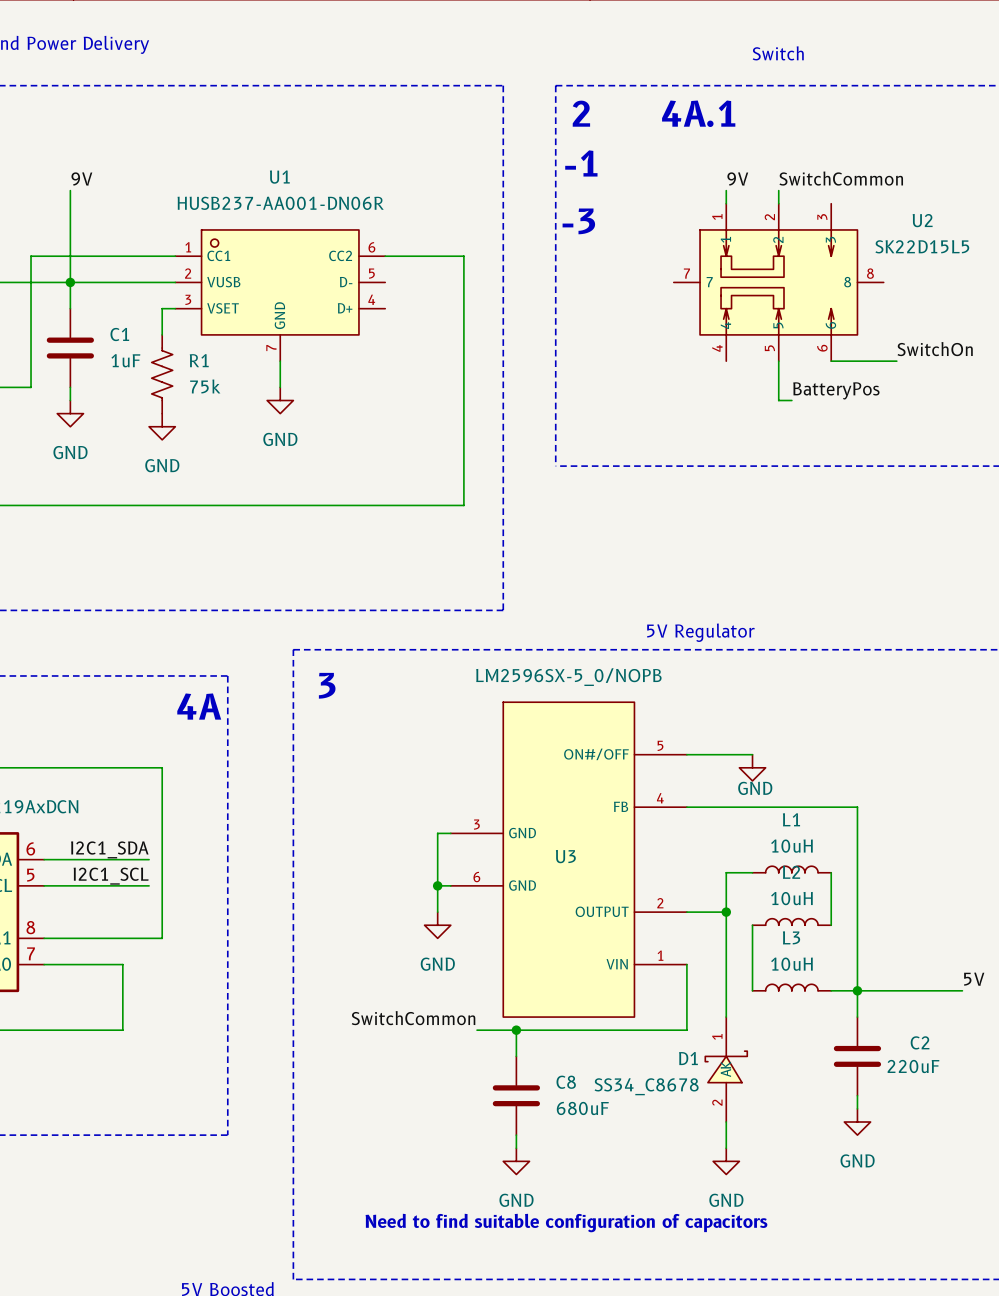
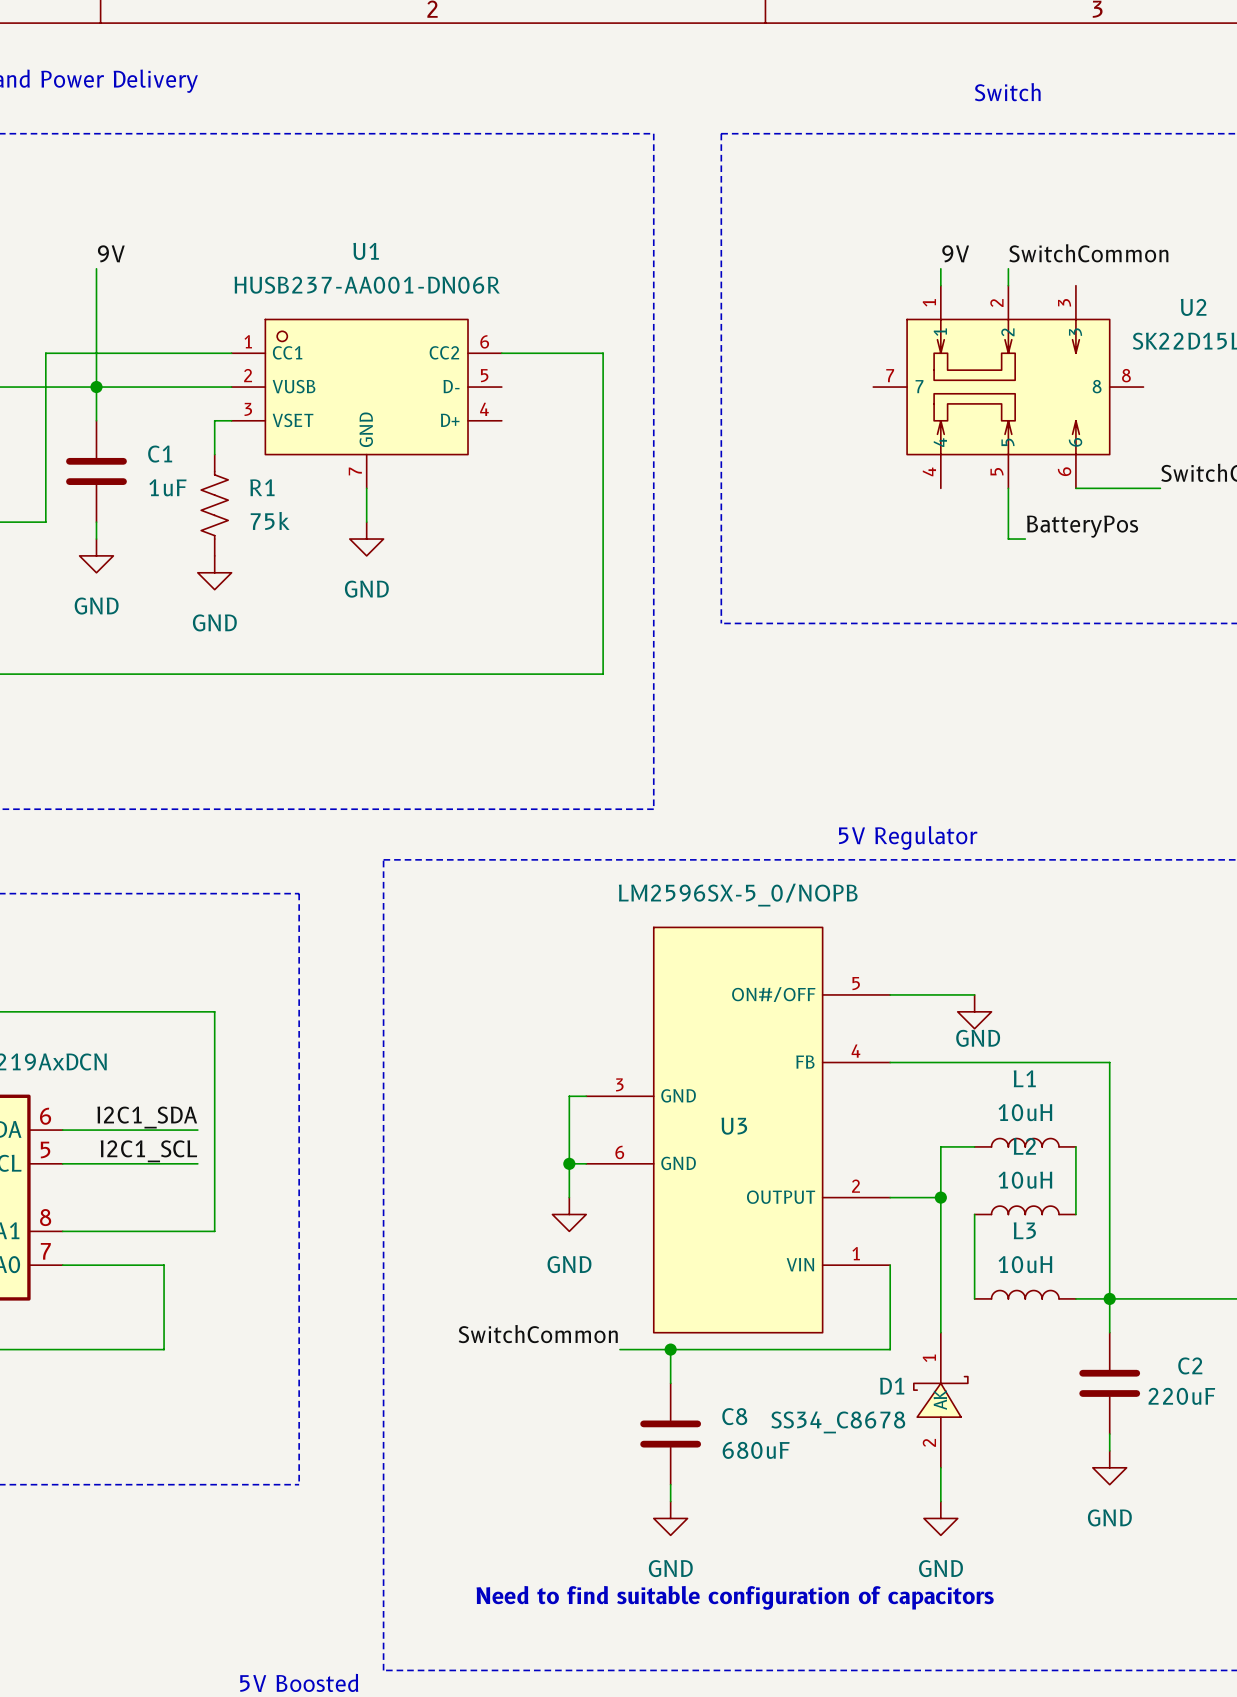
text: 2 (581, 113) -> none
text: 4A.1 (698, 113) -> none
text: -1 (581, 163) -> none
text: -3 (578, 221) -> none
text: 3 (327, 685) -> none
text: 4A (199, 706) -> none

